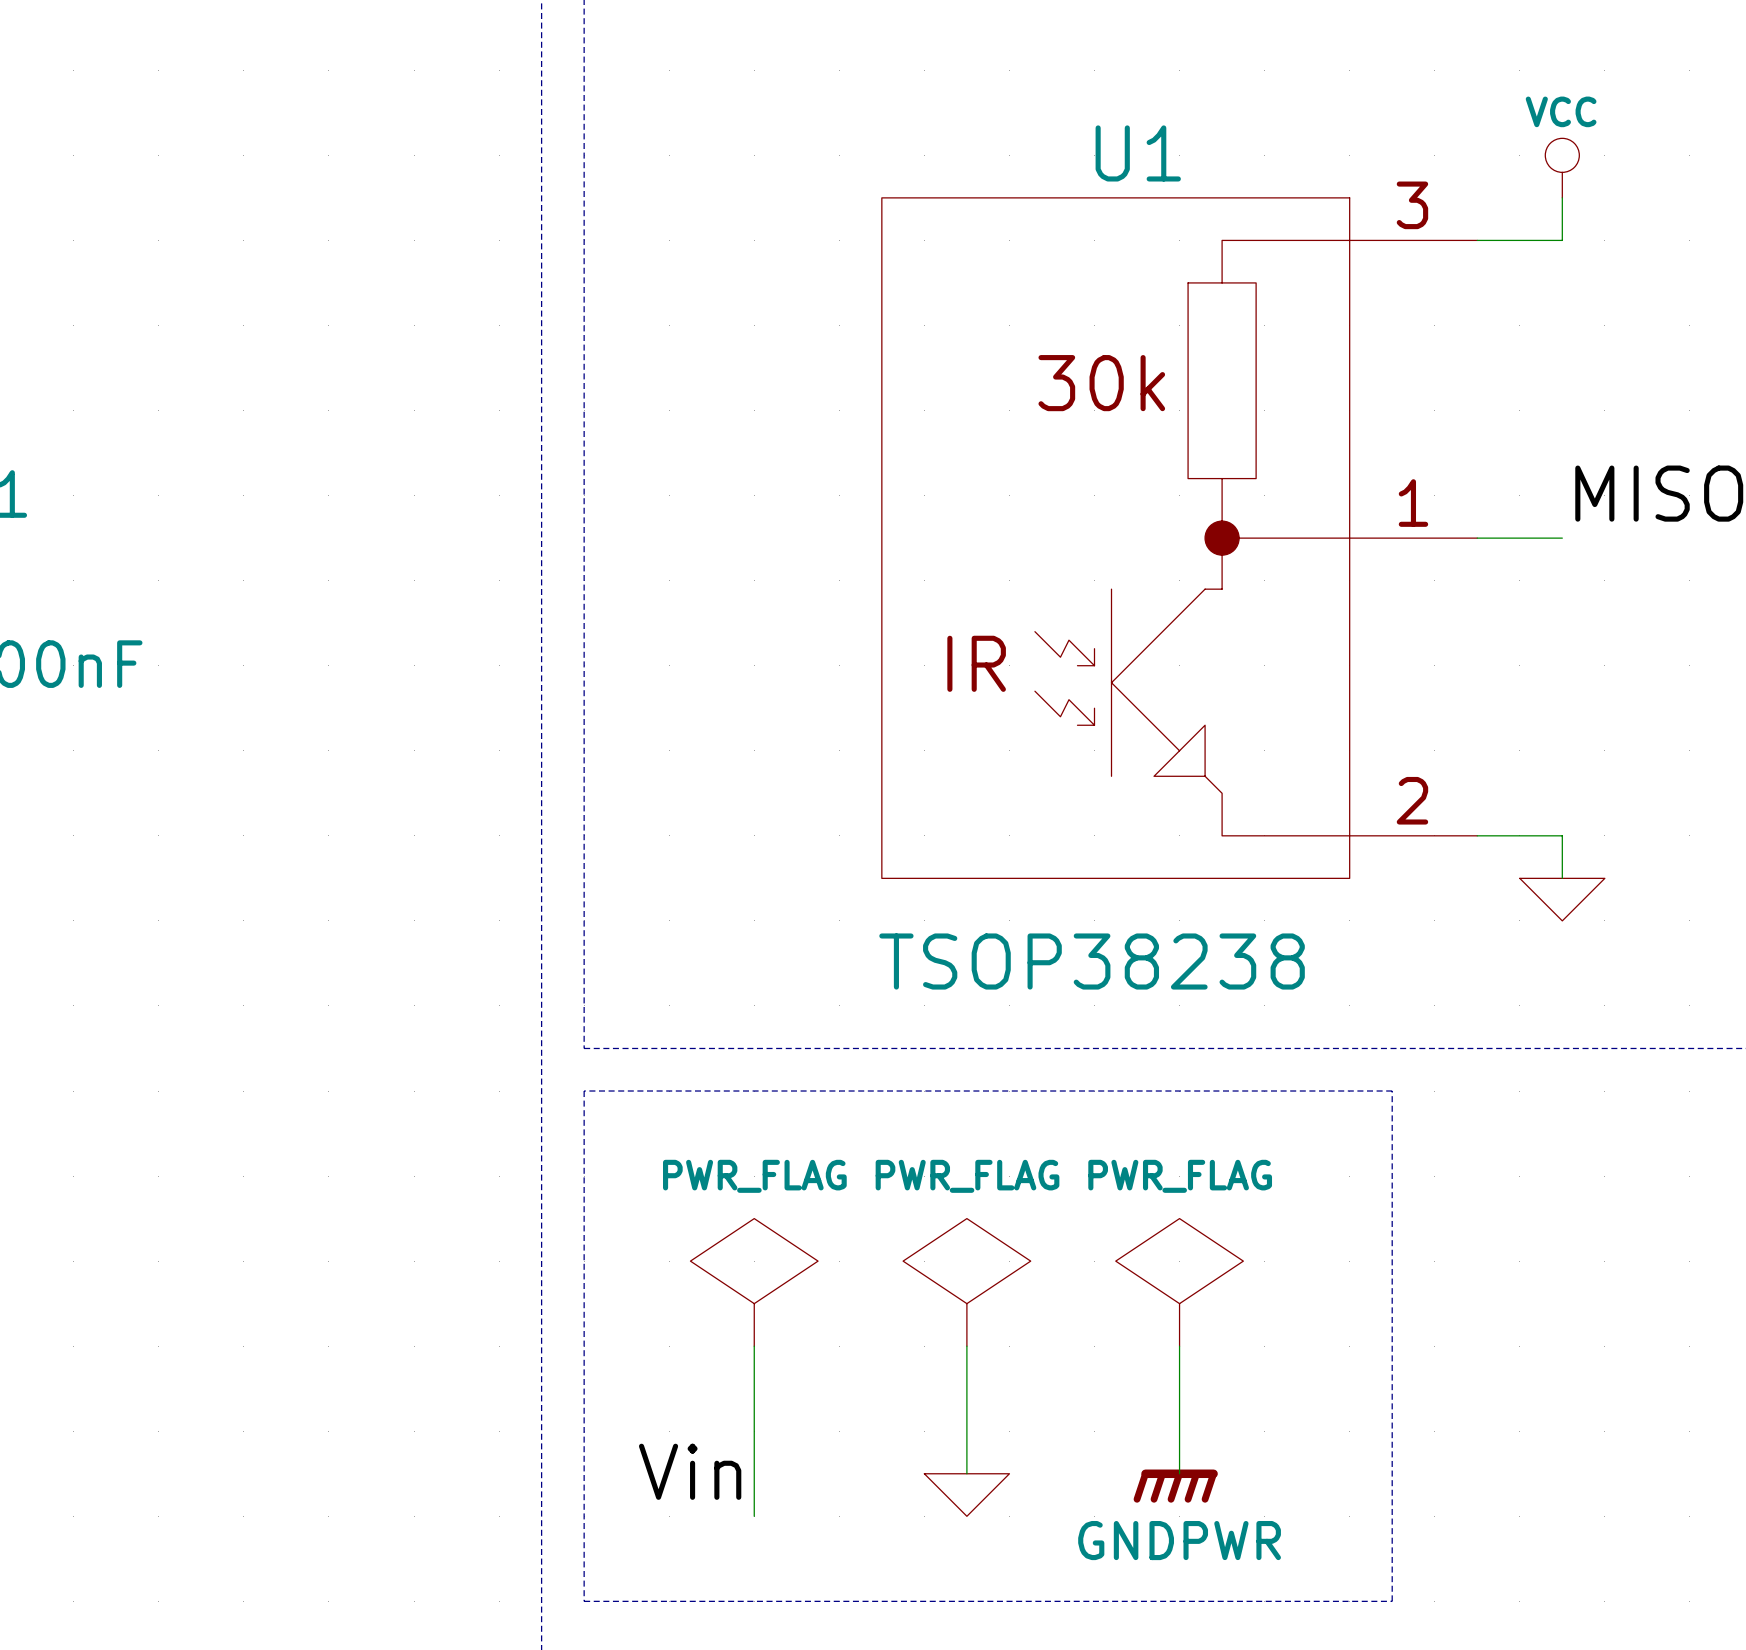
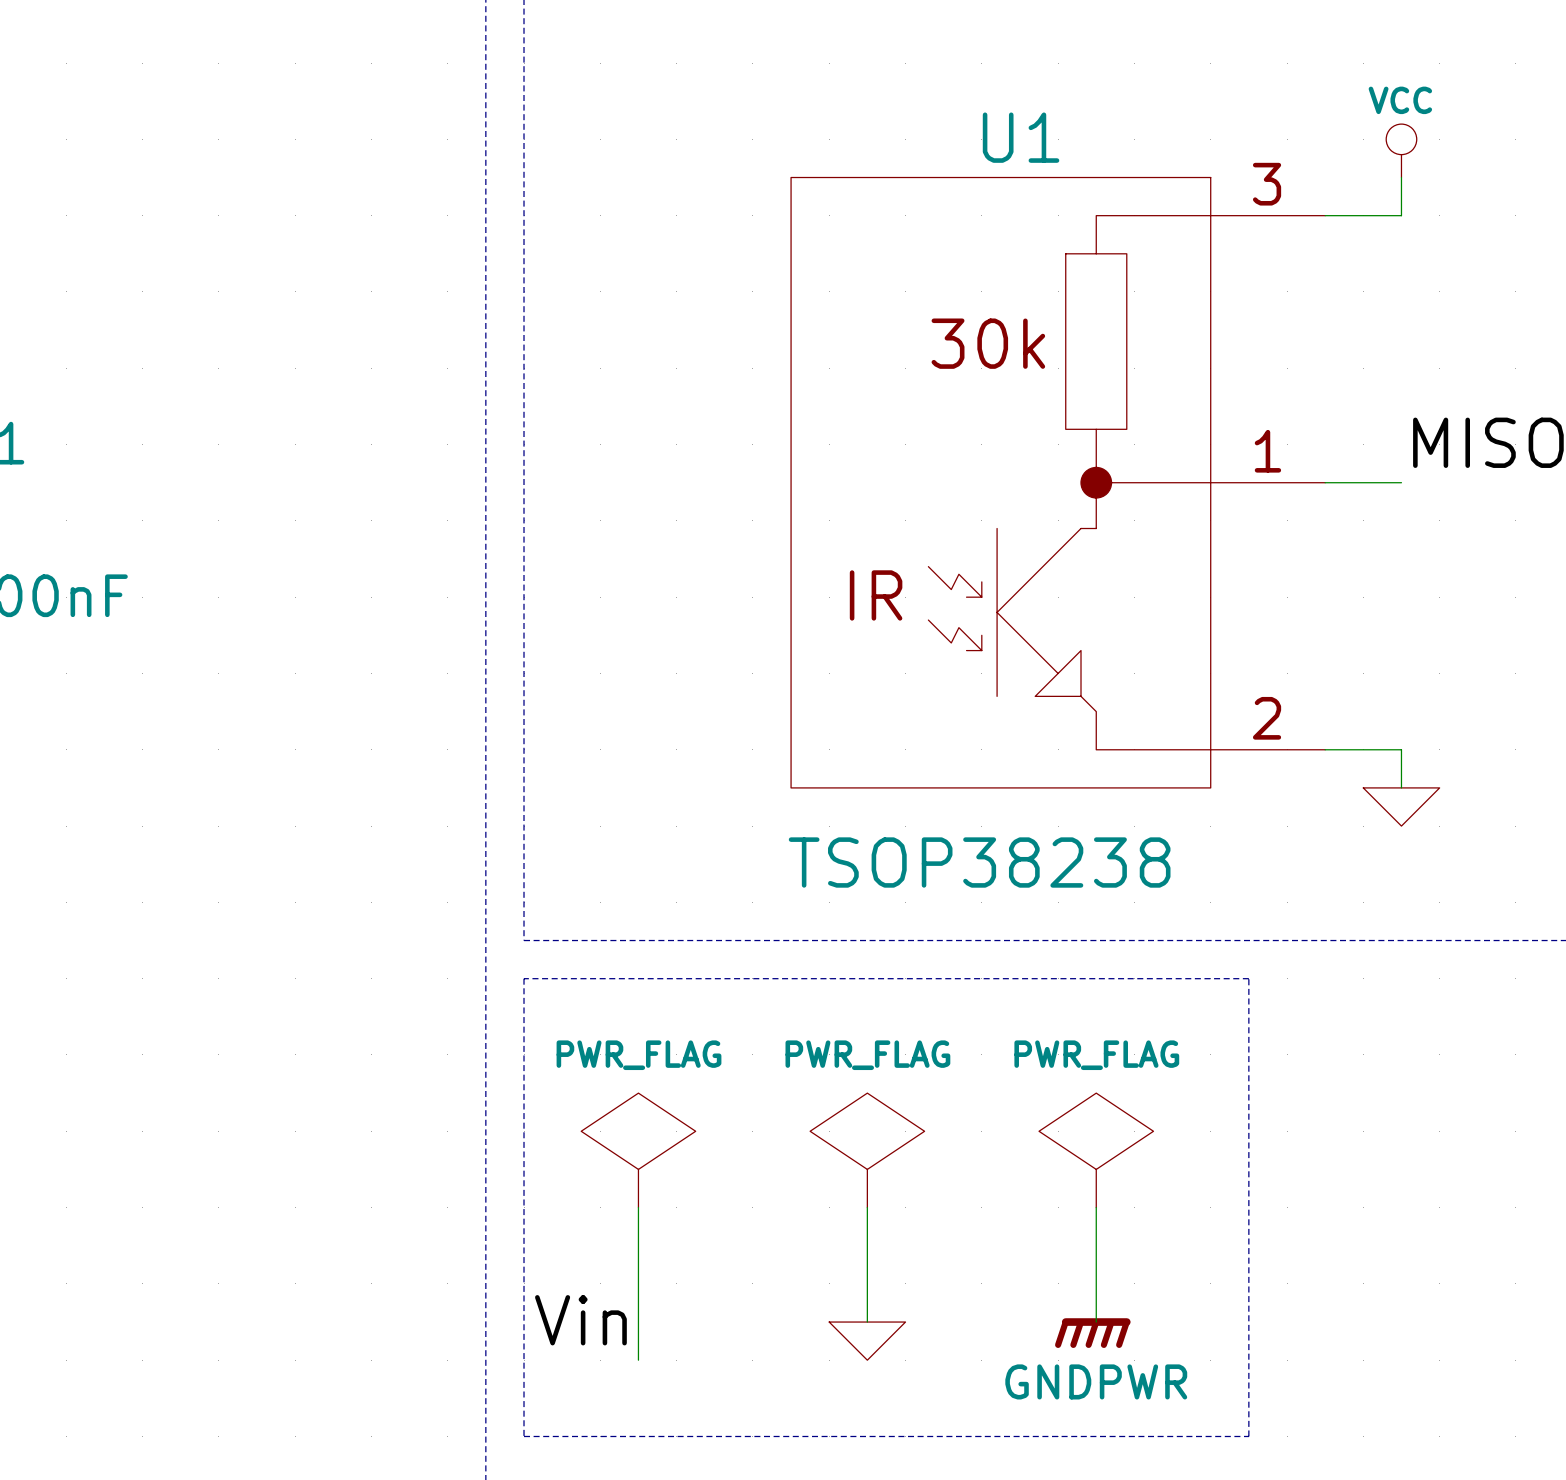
power symbol position: PWR_FLAG (754, 1282) -> PWR_FLAG (638, 1150)
power symbol position: PWR_FLAG (1179, 1282) -> PWR_FLAG (1096, 1150)
wire: (754, 1346) (754, 1516) -> (638, 1207) (638, 1360)
wire: (1179, 1346) (1179, 1473) -> (1096, 1207) (1096, 1322)
label position: Vin (690, 1471) -> Vin (580, 1320)
power symbol position: GNDPWR (1175, 1486) -> GNDPWR (1092, 1333)

